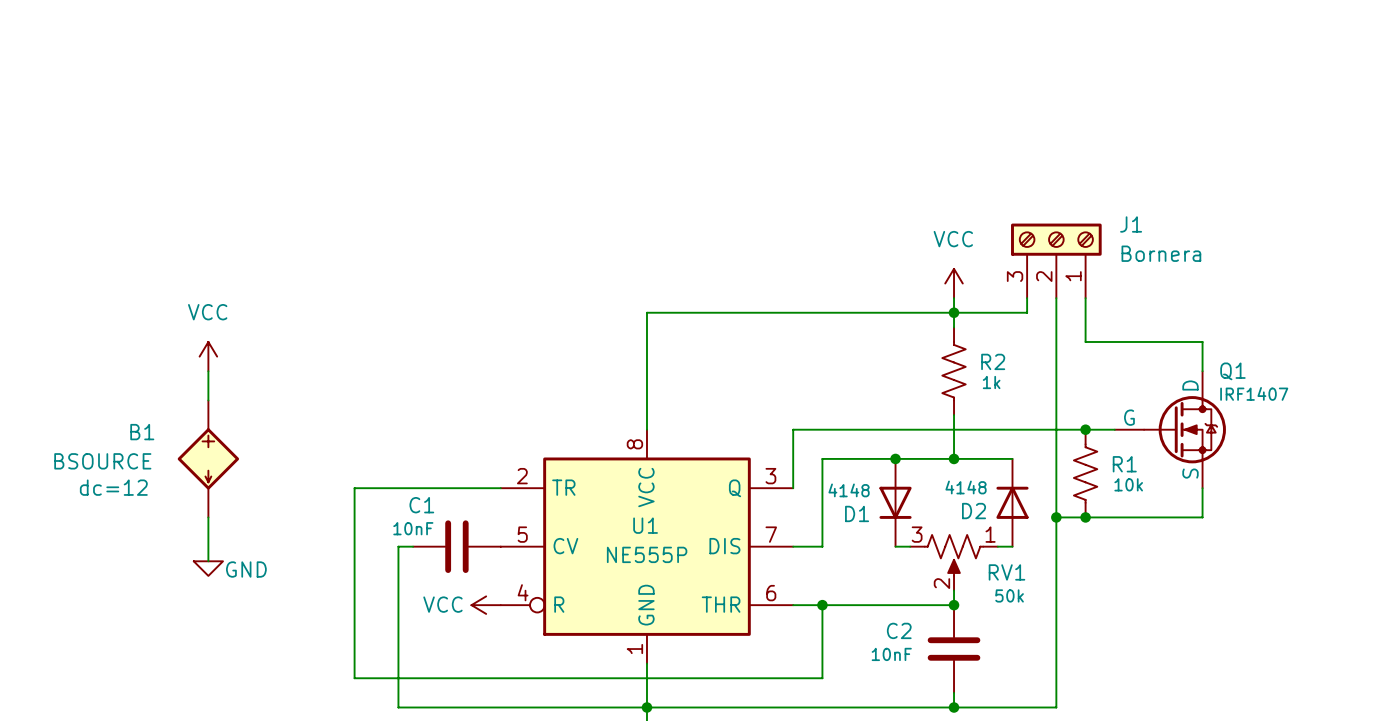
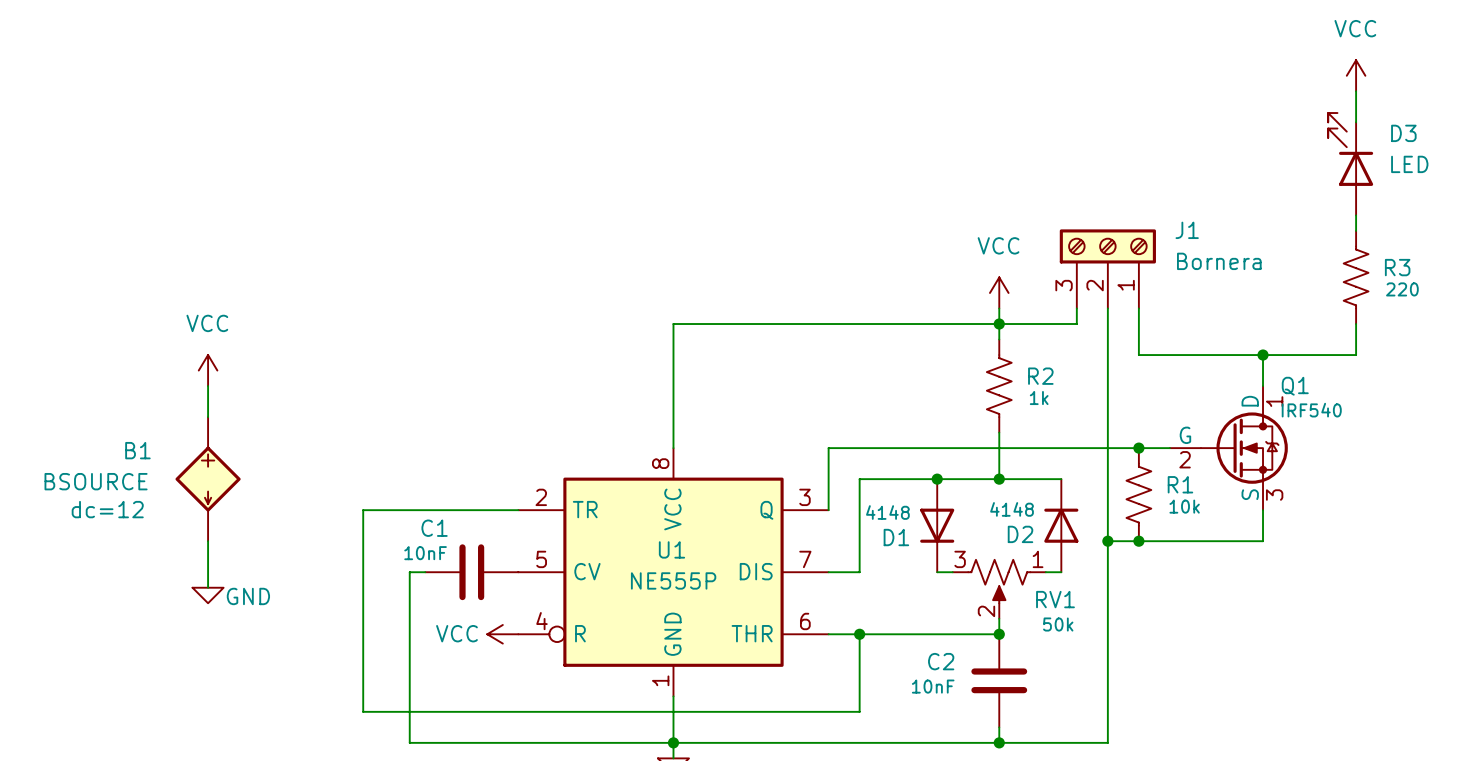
power symbol: none -> VCC (1356, 75)
wire: none -> (1356, 91) (1356, 122)
D3: none -> LED (1350, 164)
wire: none -> (1356, 215) (1356, 230)
R3: none -> 220 (1356, 277)
wire: none -> (1356, 324) (1356, 355) (1263, 355)
junction: none -> (1263, 355)
Q1 pin number: none -> 1 (1274, 401)
Q1 value: IRF1407 (1254, 393) -> IRF540 (1311, 410)
Q1 pin number: none -> 2 (1185, 459)
Q1 pin number: none -> 3 (1274, 495)

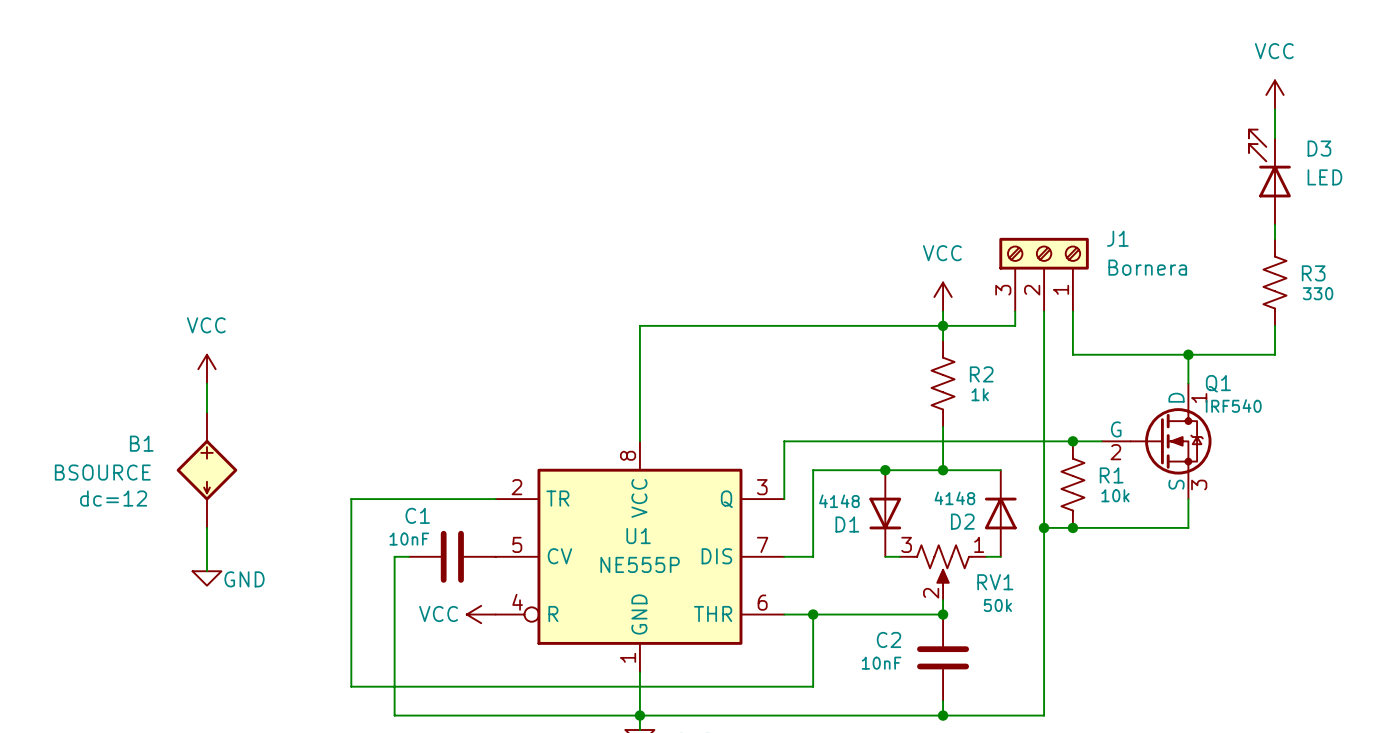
R3 value: 220 (1402, 289) -> 330 (1318, 293)

